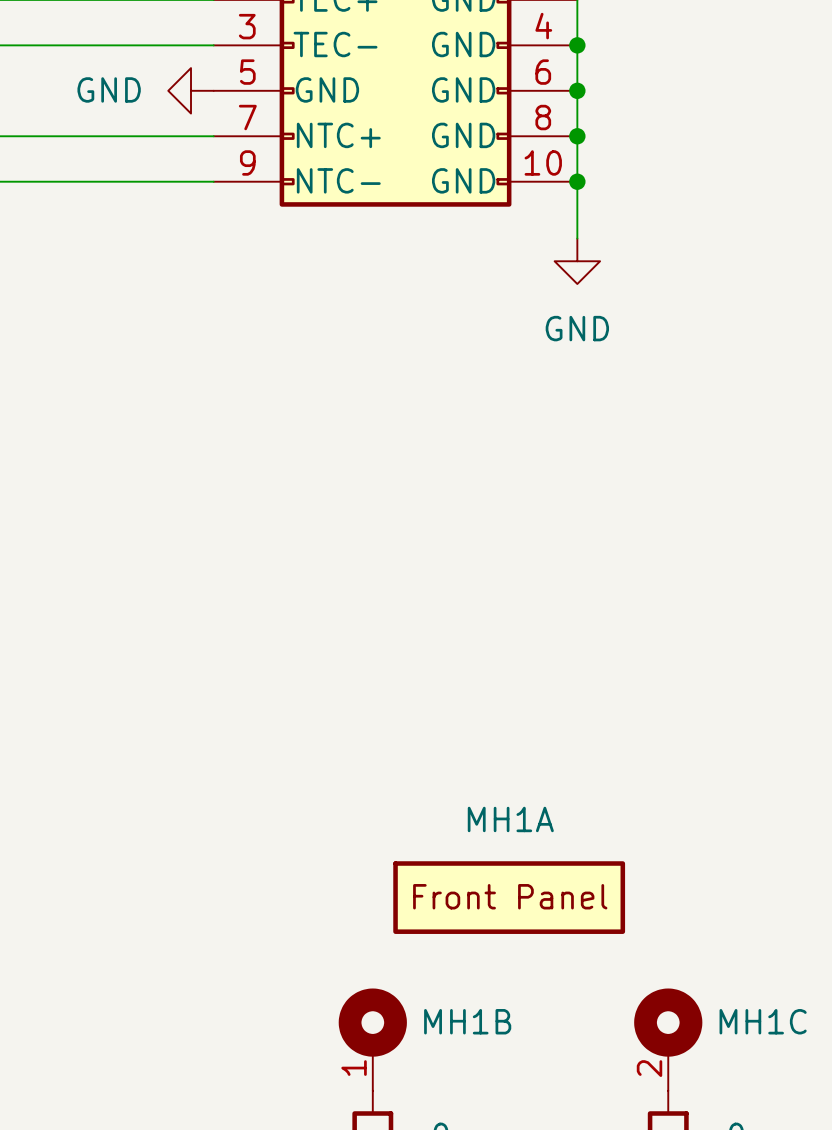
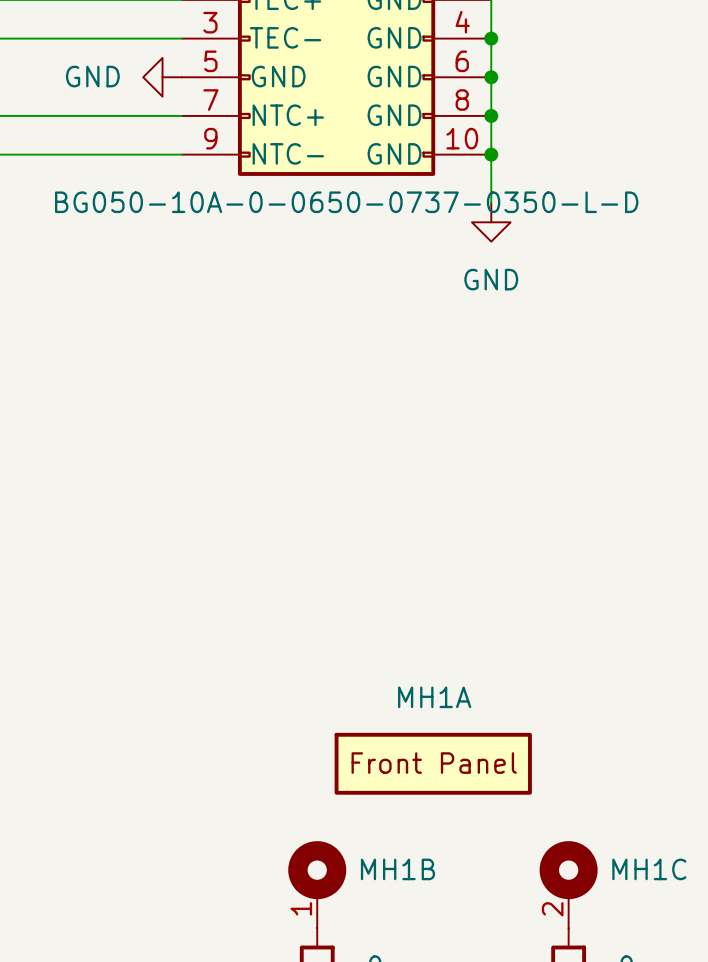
part value: none -> BG050-10A-0-0650-0737-0350-L-D (346, 202)

